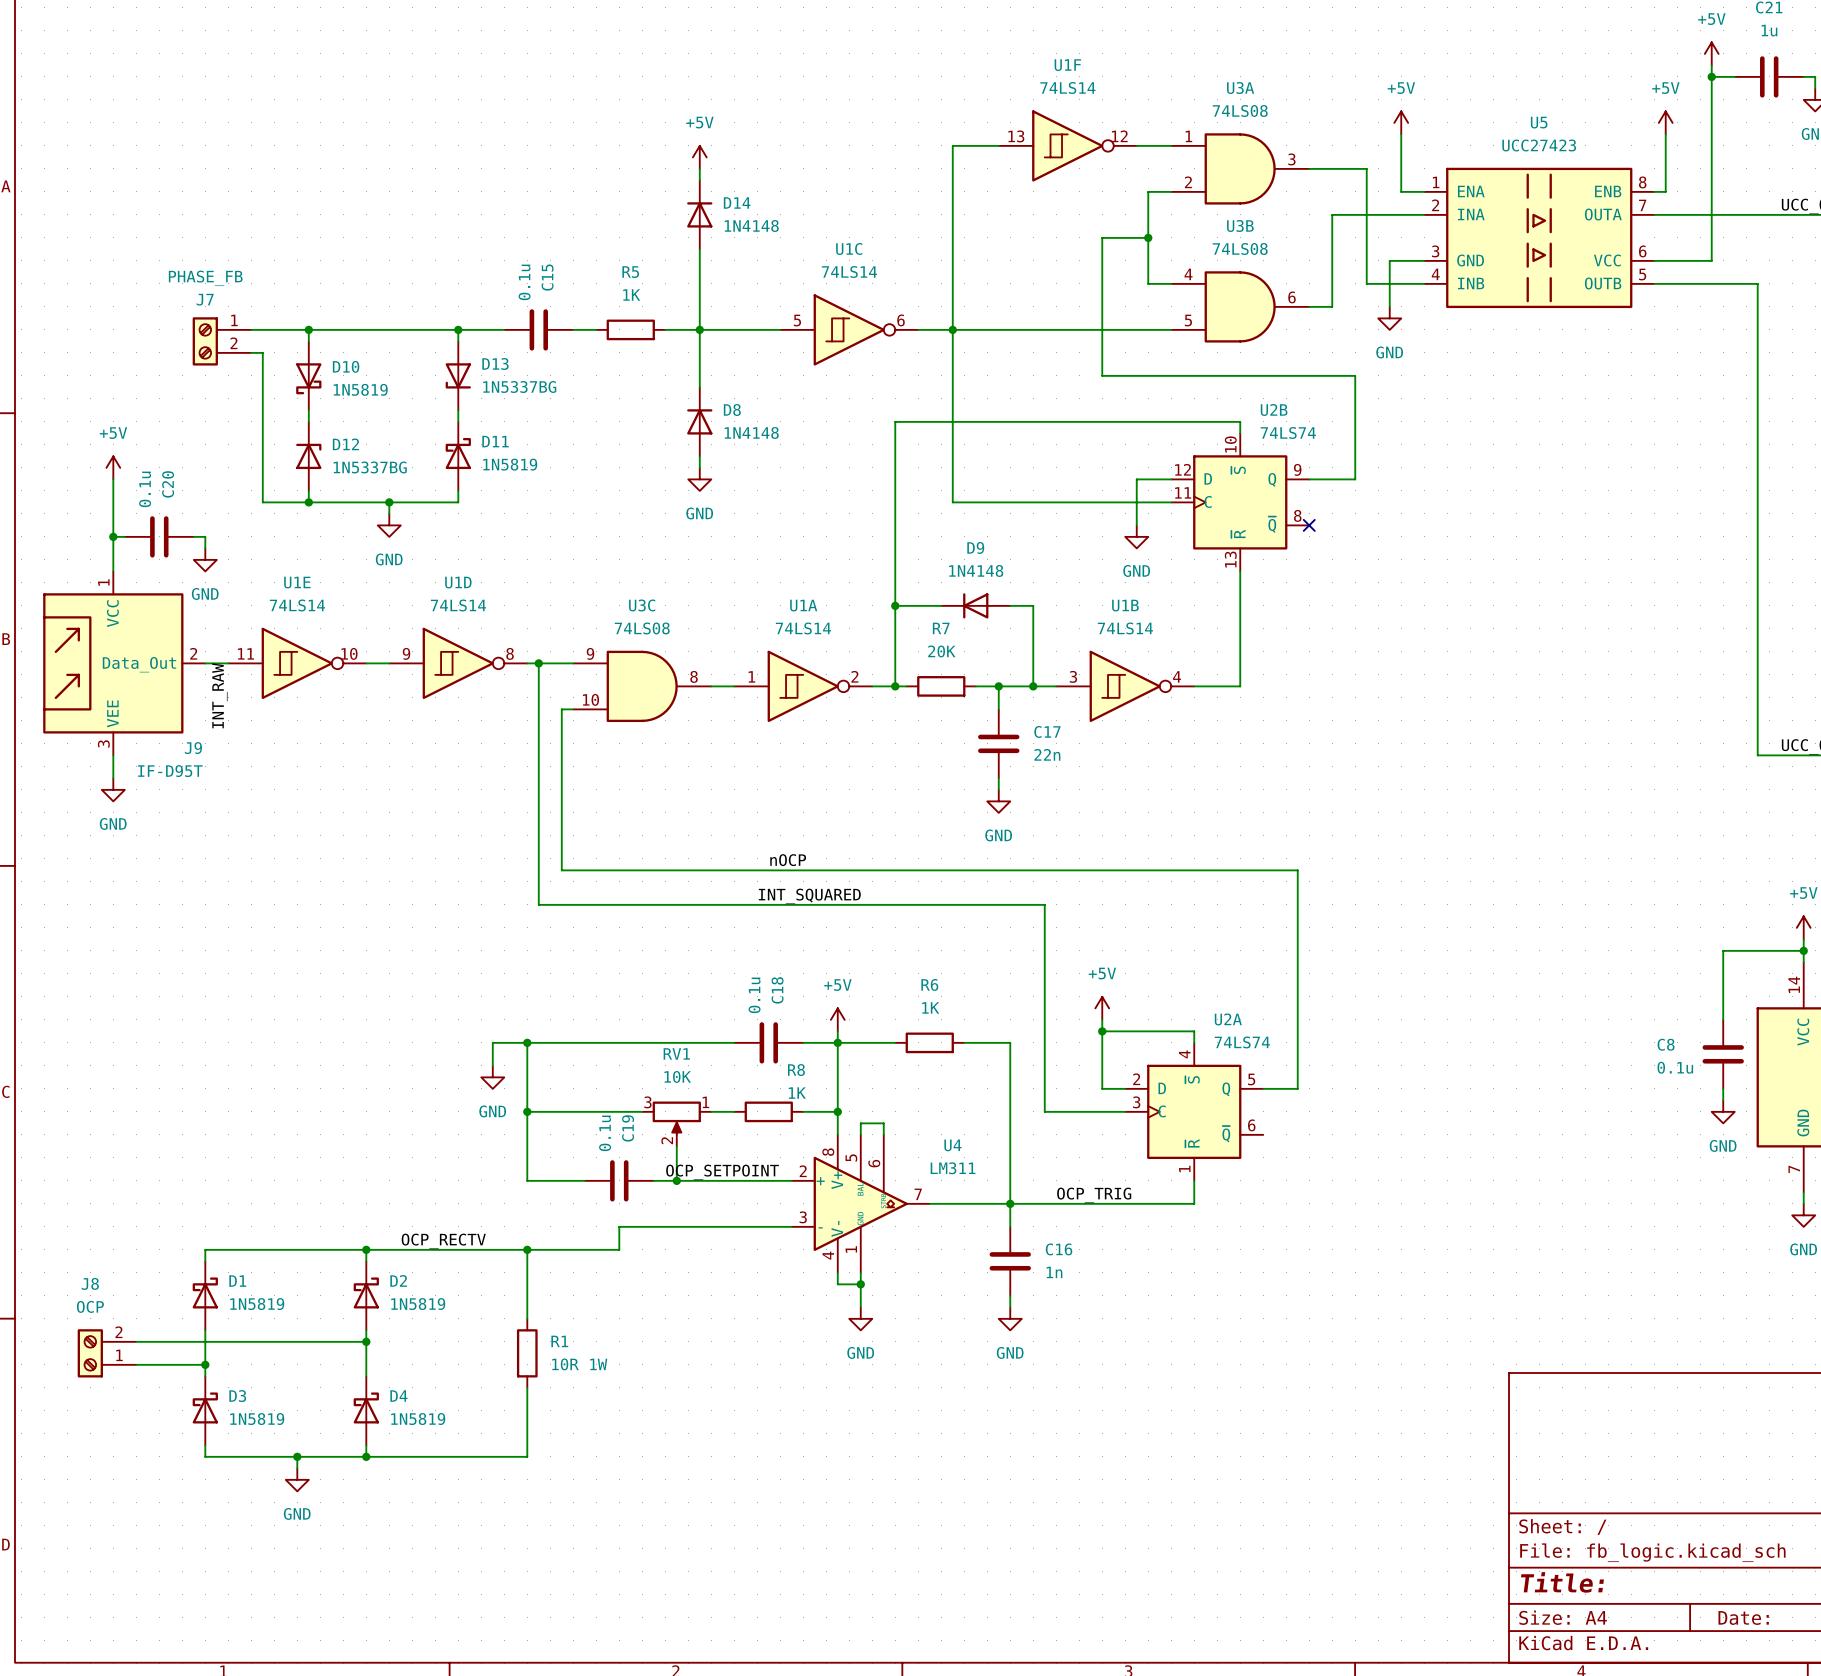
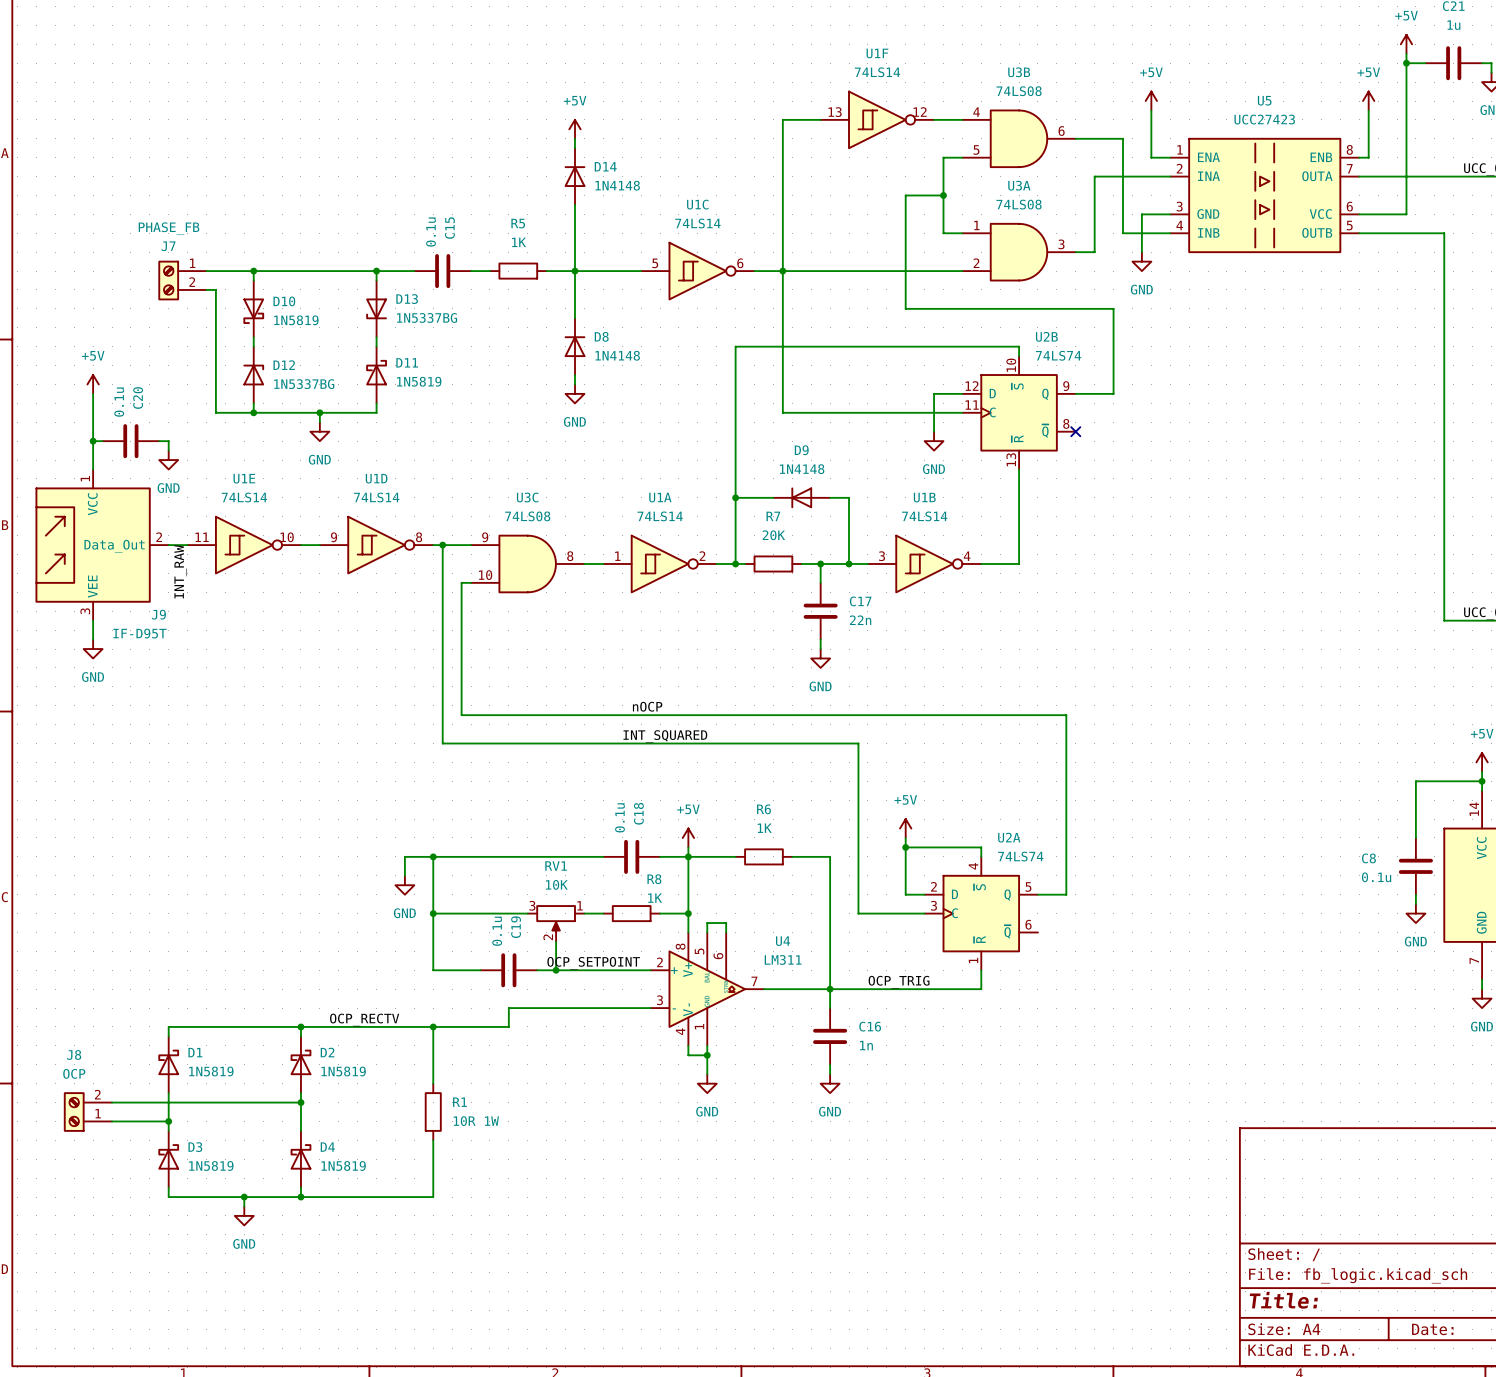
U3A position: (1240, 168) -> (1019, 252)
U3B position: (1240, 306) -> (1019, 138)

